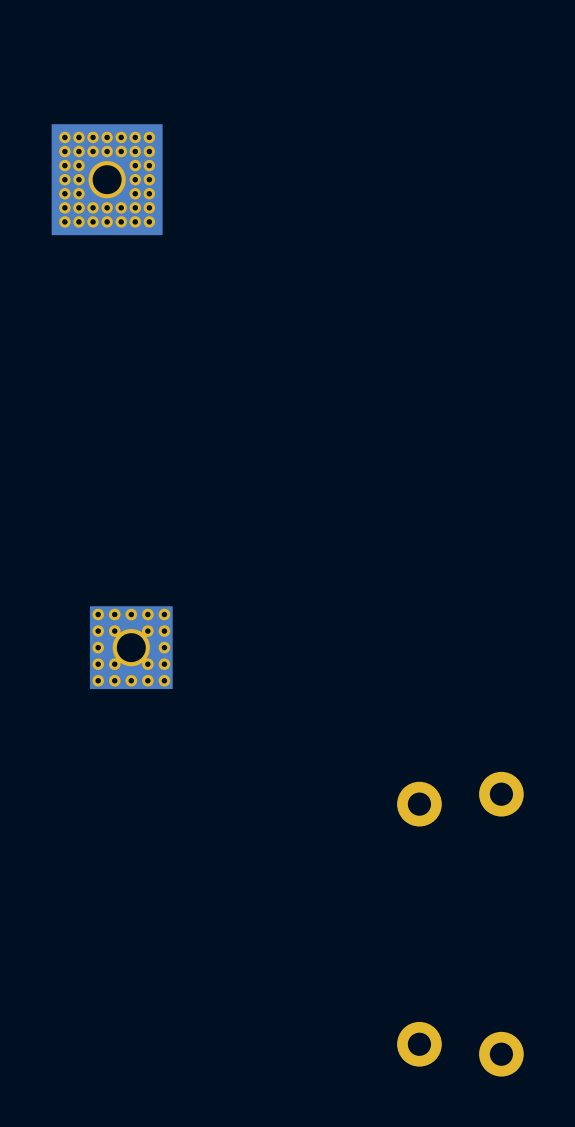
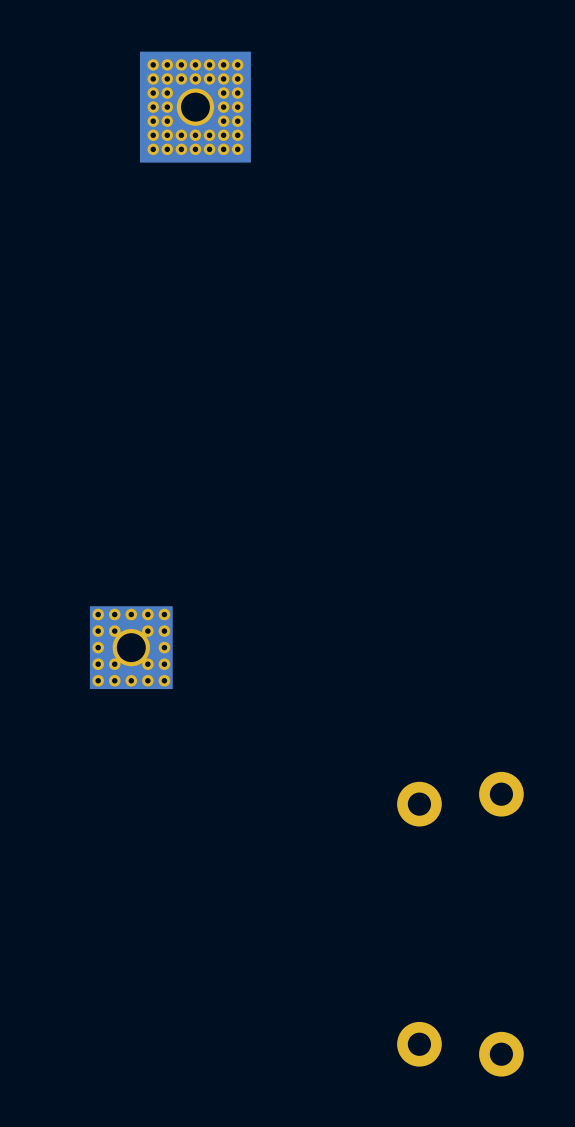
part position: (107, 179) -> (195, 107)

